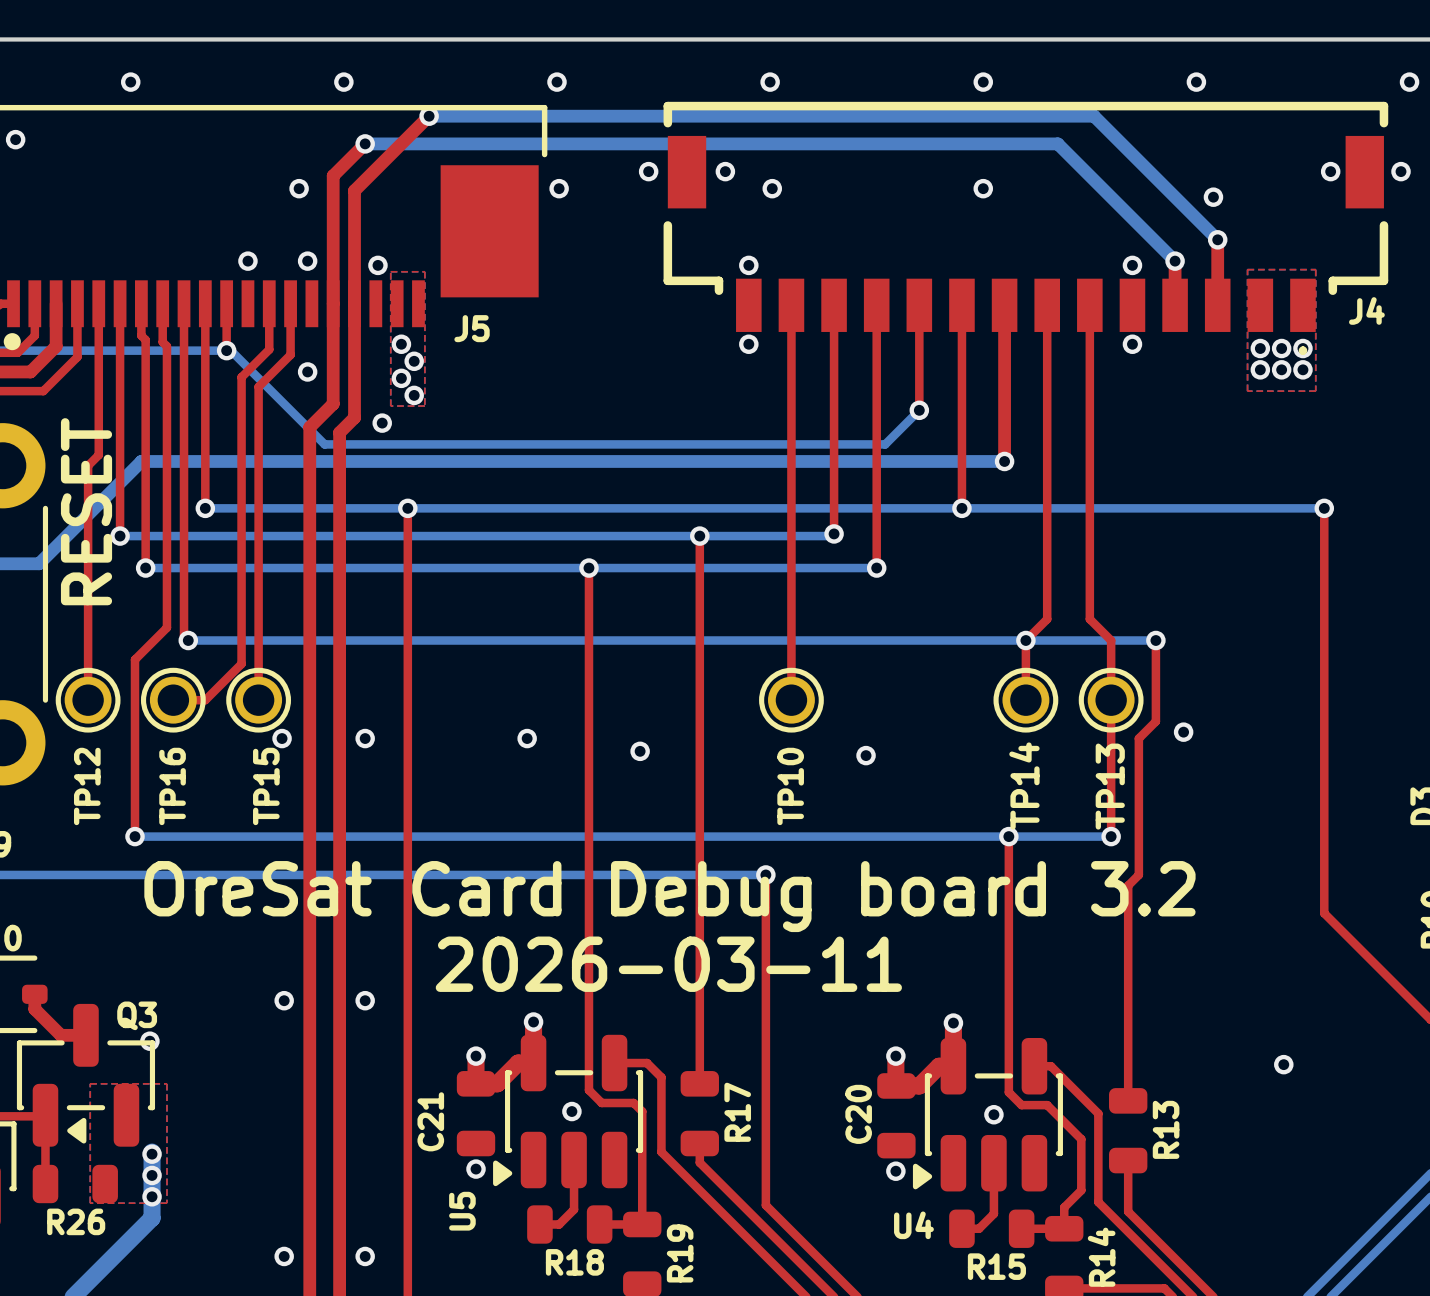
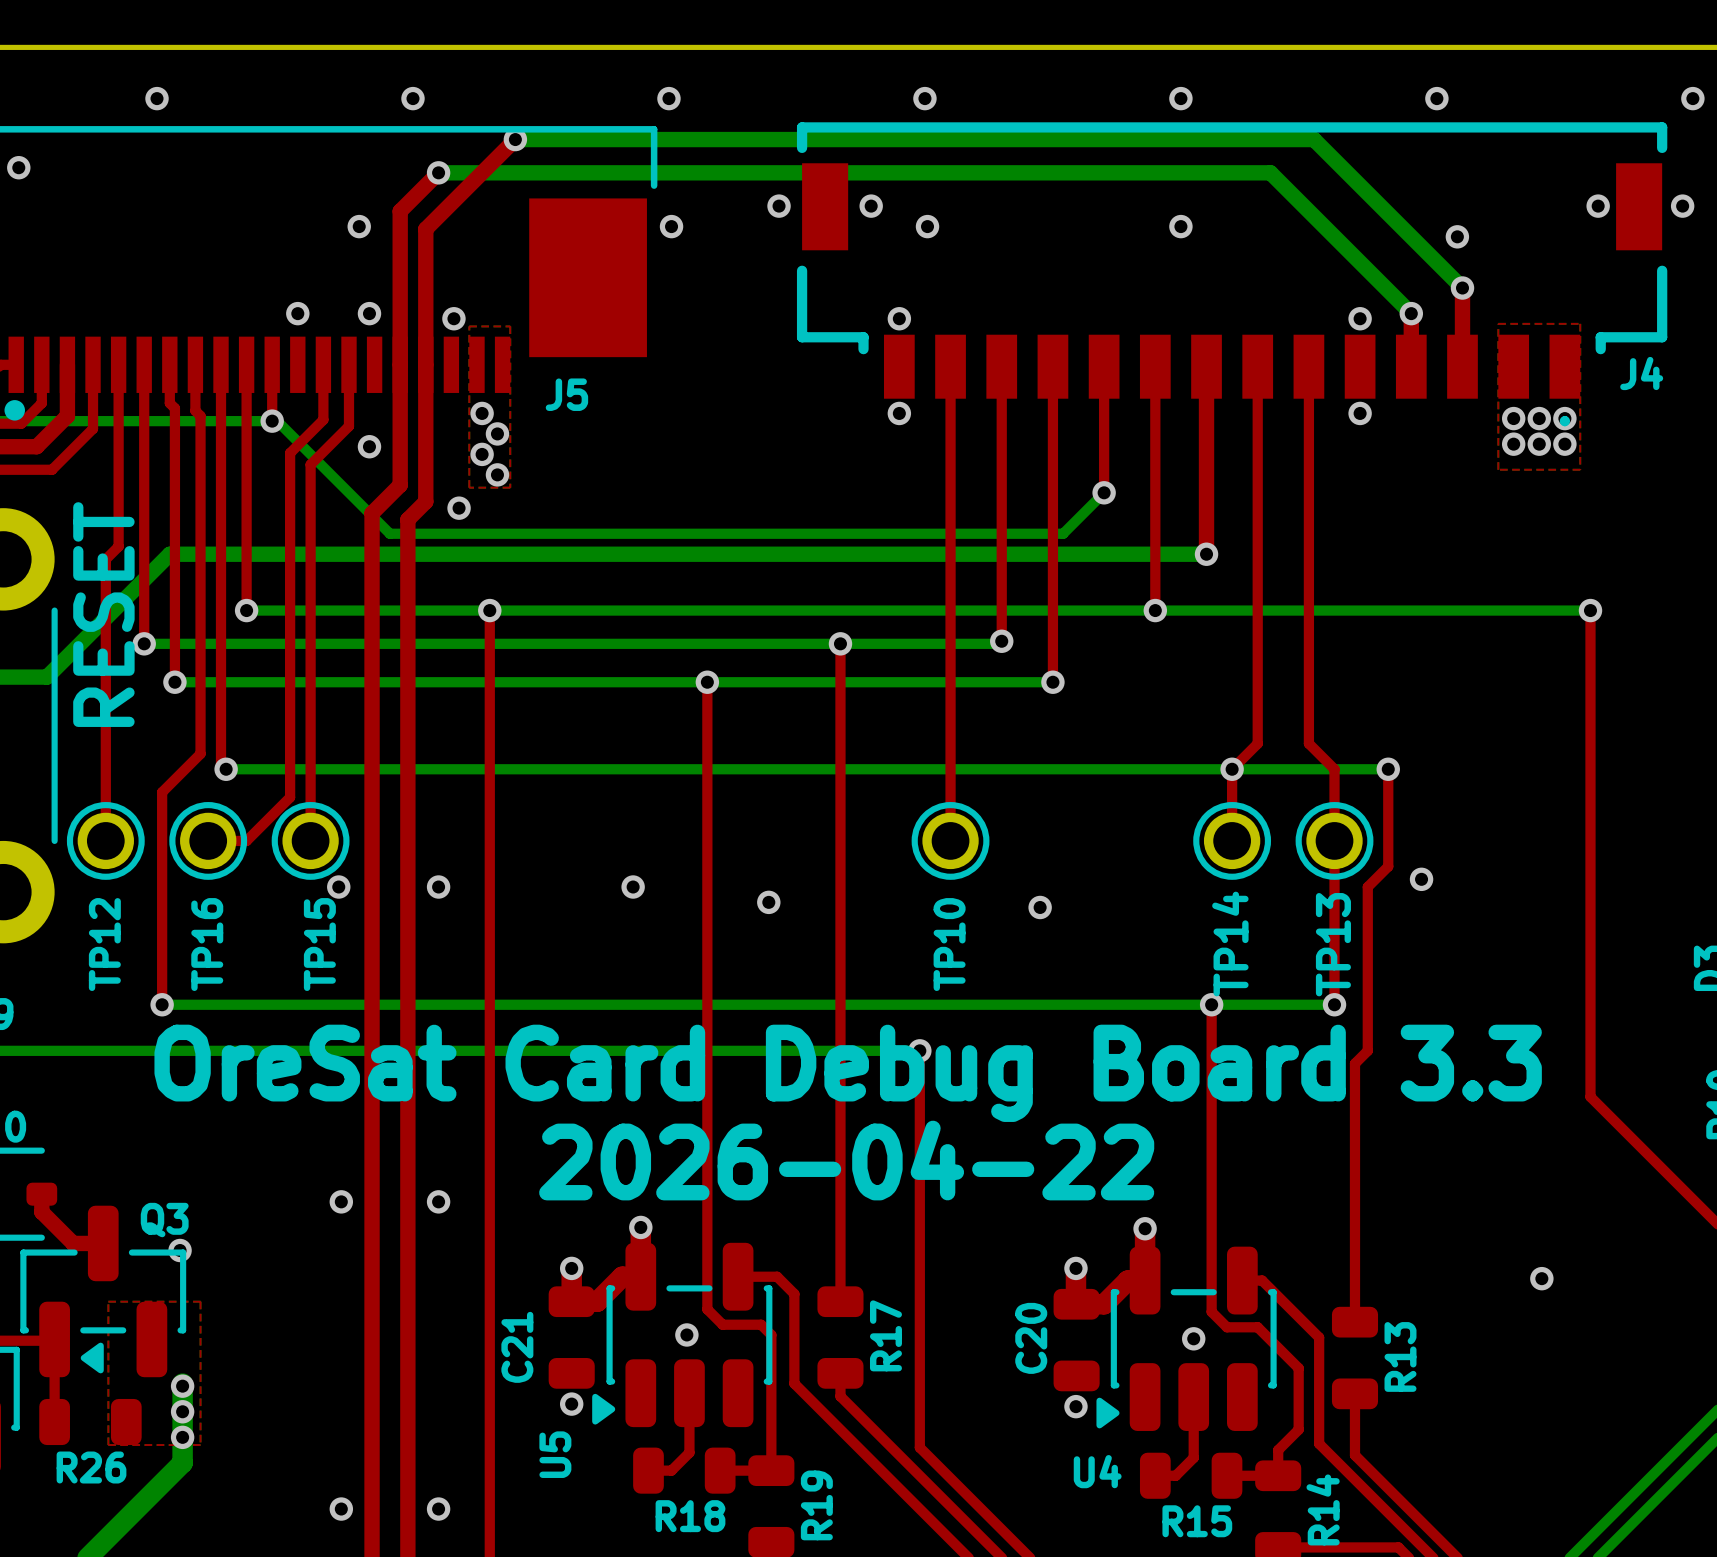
text: OreSat Card Debug board 3.2 (669, 896) -> OreSat Card Debug Board 3.3 (848, 1073)
text: 2026-03-11 (668, 964) -> 2026-04-22 (846, 1160)

